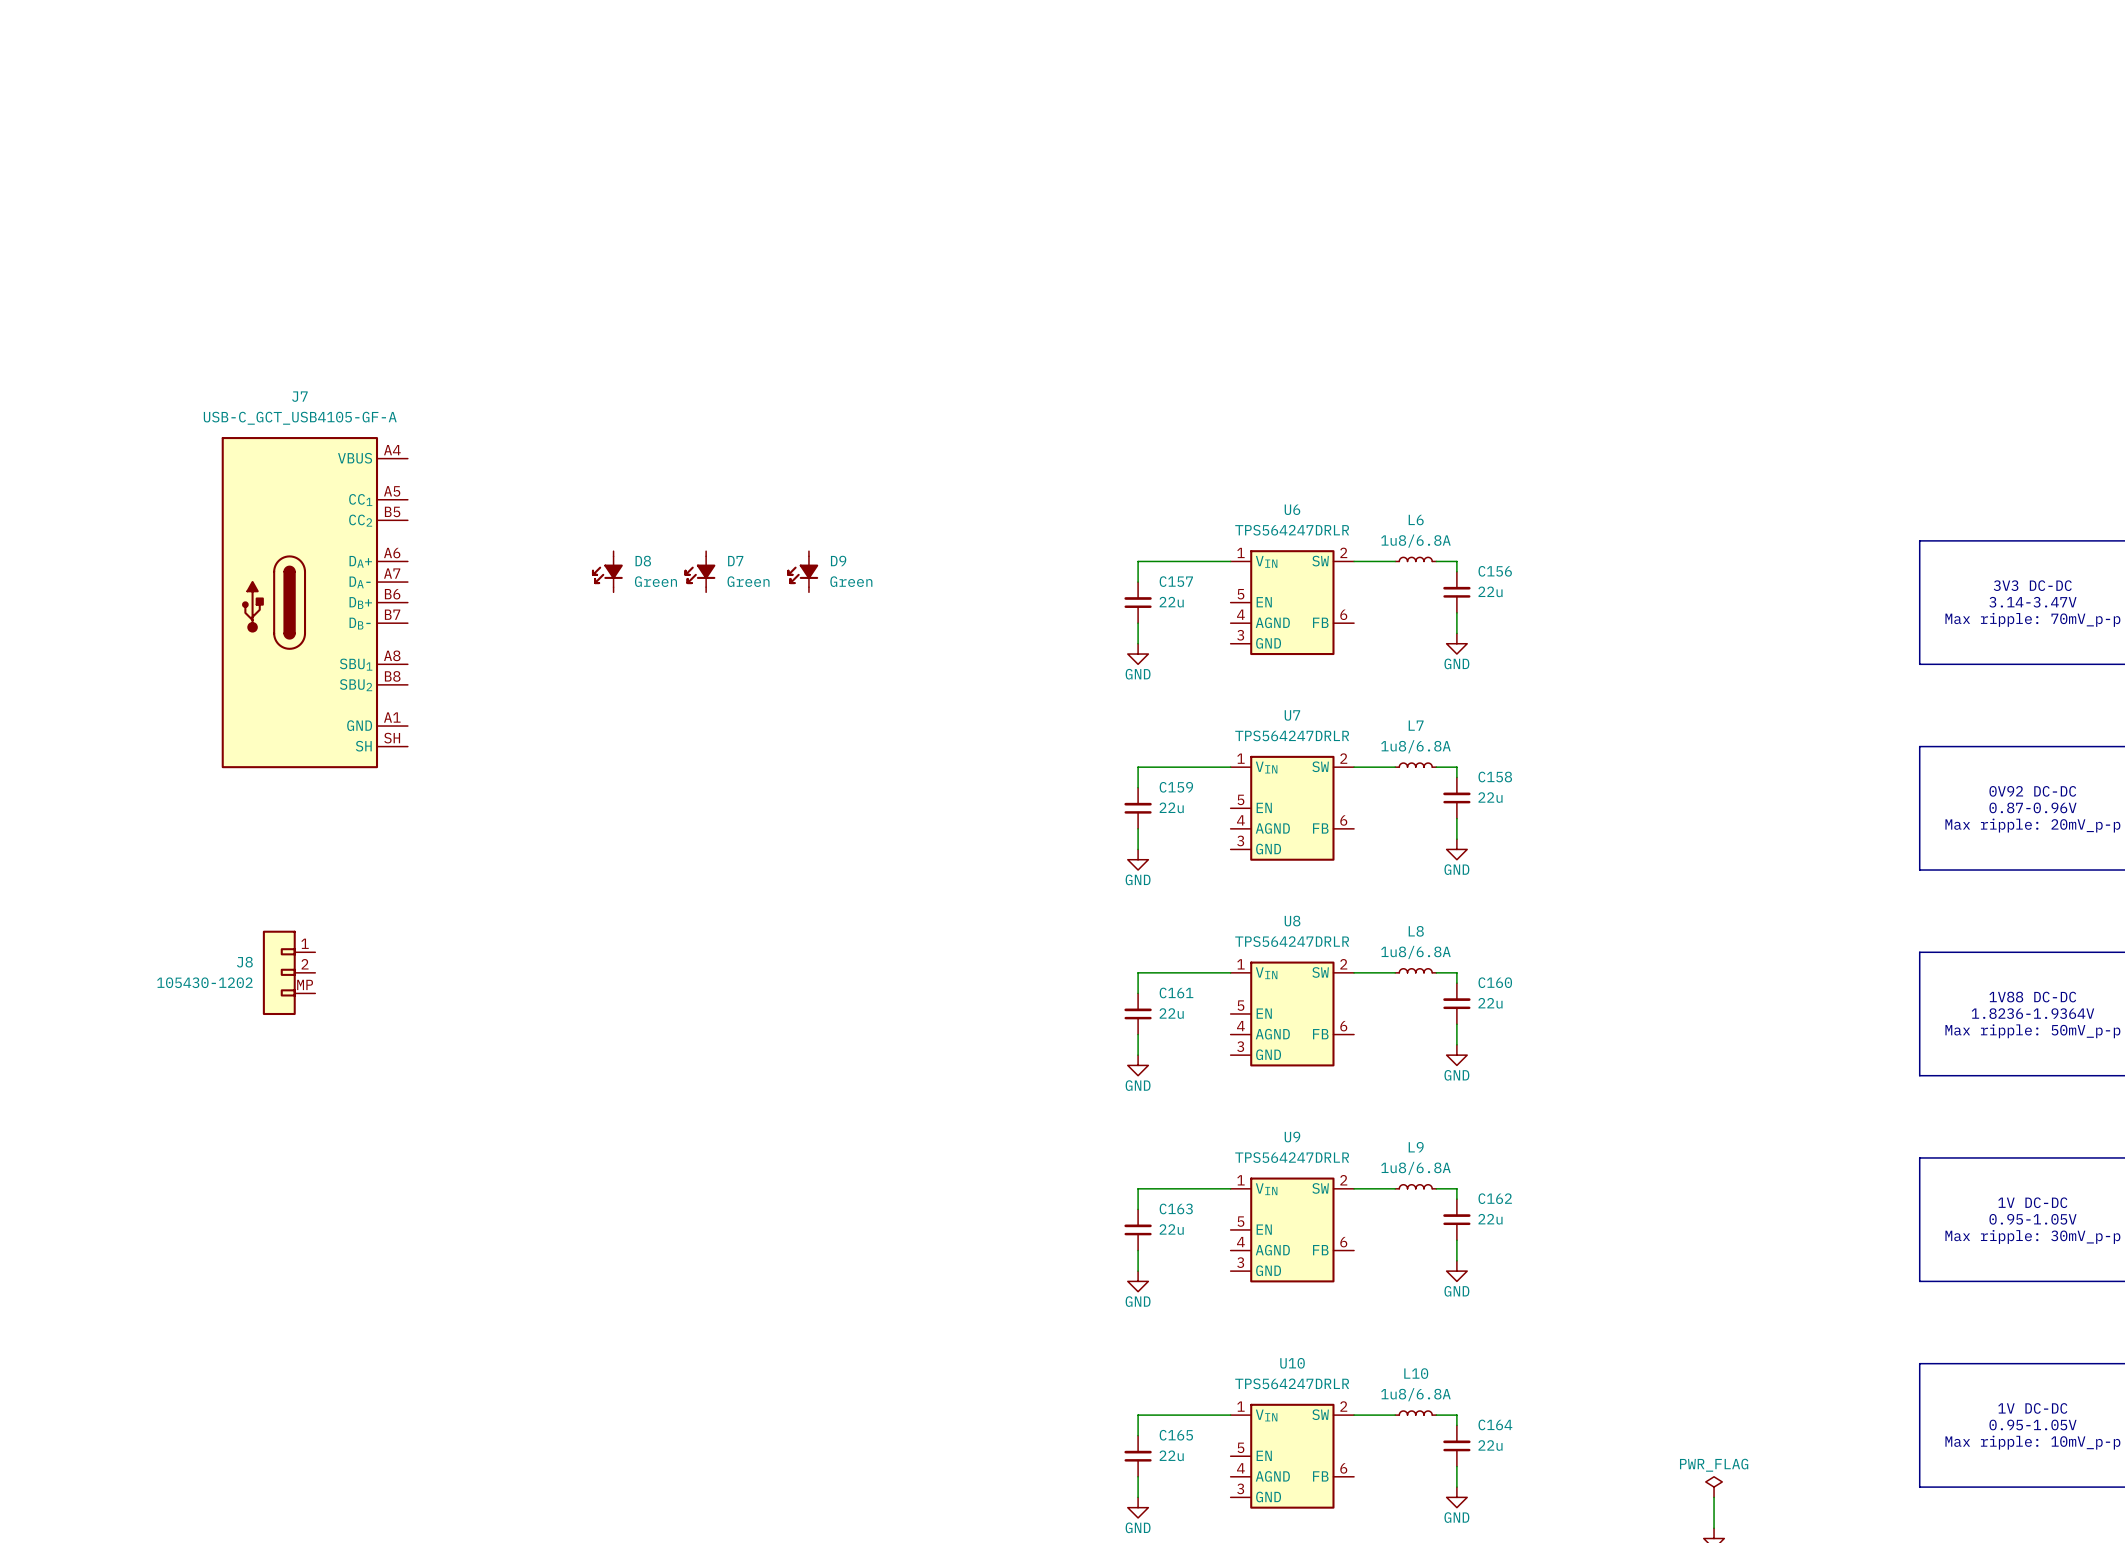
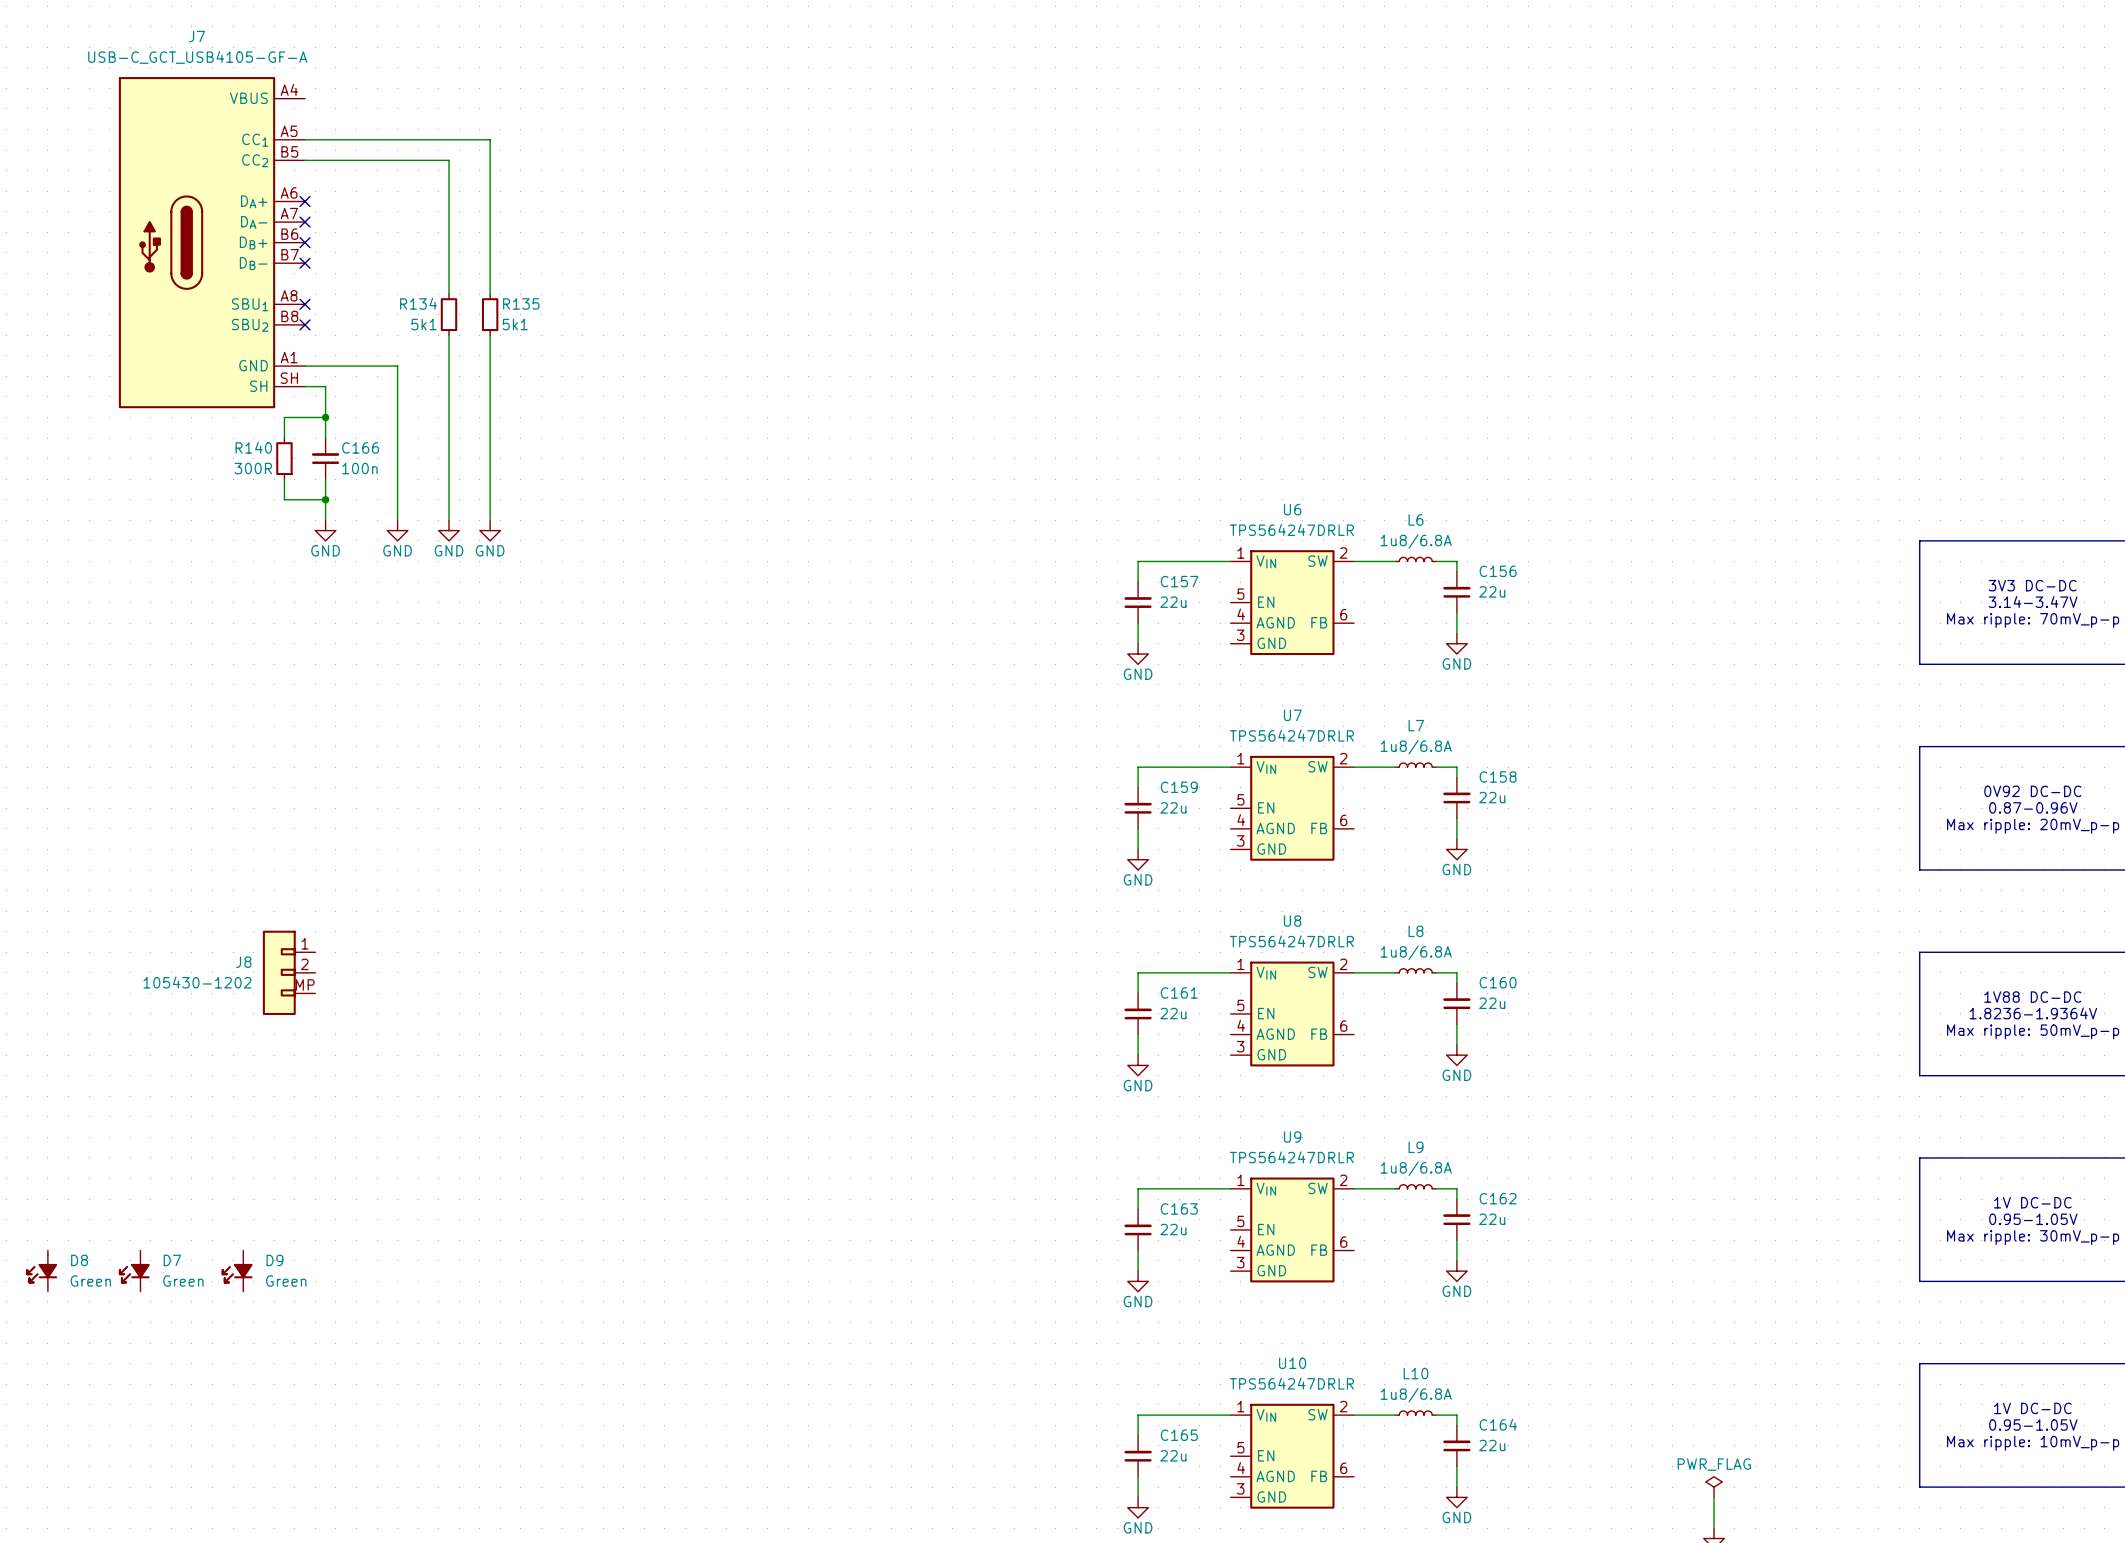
wire: none -> (305, 139) (490, 139) (490, 294)
wire: none -> (305, 160) (449, 160) (449, 294)
no-connect mark: none -> (305, 201)
no-connect mark: none -> (305, 222)
no-connect mark: none -> (305, 242)
no-connect mark: none -> (305, 263)
no-connect mark: none -> (305, 304)
R134: none -> (449, 314)
R135: none -> (490, 314)
no-connect mark: none -> (305, 324)
wire: none -> (449, 335) (449, 520)
wire: none -> (490, 335) (490, 520)
wire: none -> (305, 366) (397, 366) (397, 520)
wire: none -> (305, 386) (325, 386) (325, 438)
wire: none -> (325, 417) (284, 417) (284, 438)
junction: none -> (325, 417)
R140: none -> (284, 458)
C166: none -> (325, 458)
junction: none -> (325, 499)
power symbol: none -> GND (325, 530)
power symbol: none -> GND (397, 530)
power symbol: none -> GND (449, 530)
power symbol: none -> GND (490, 530)
D8 position: (607, 571) -> (41, 1271)
D7 position: (699, 571) -> (134, 1271)
D9 position: (802, 571) -> (237, 1271)
J7 position: (314, 602) -> (211, 242)

